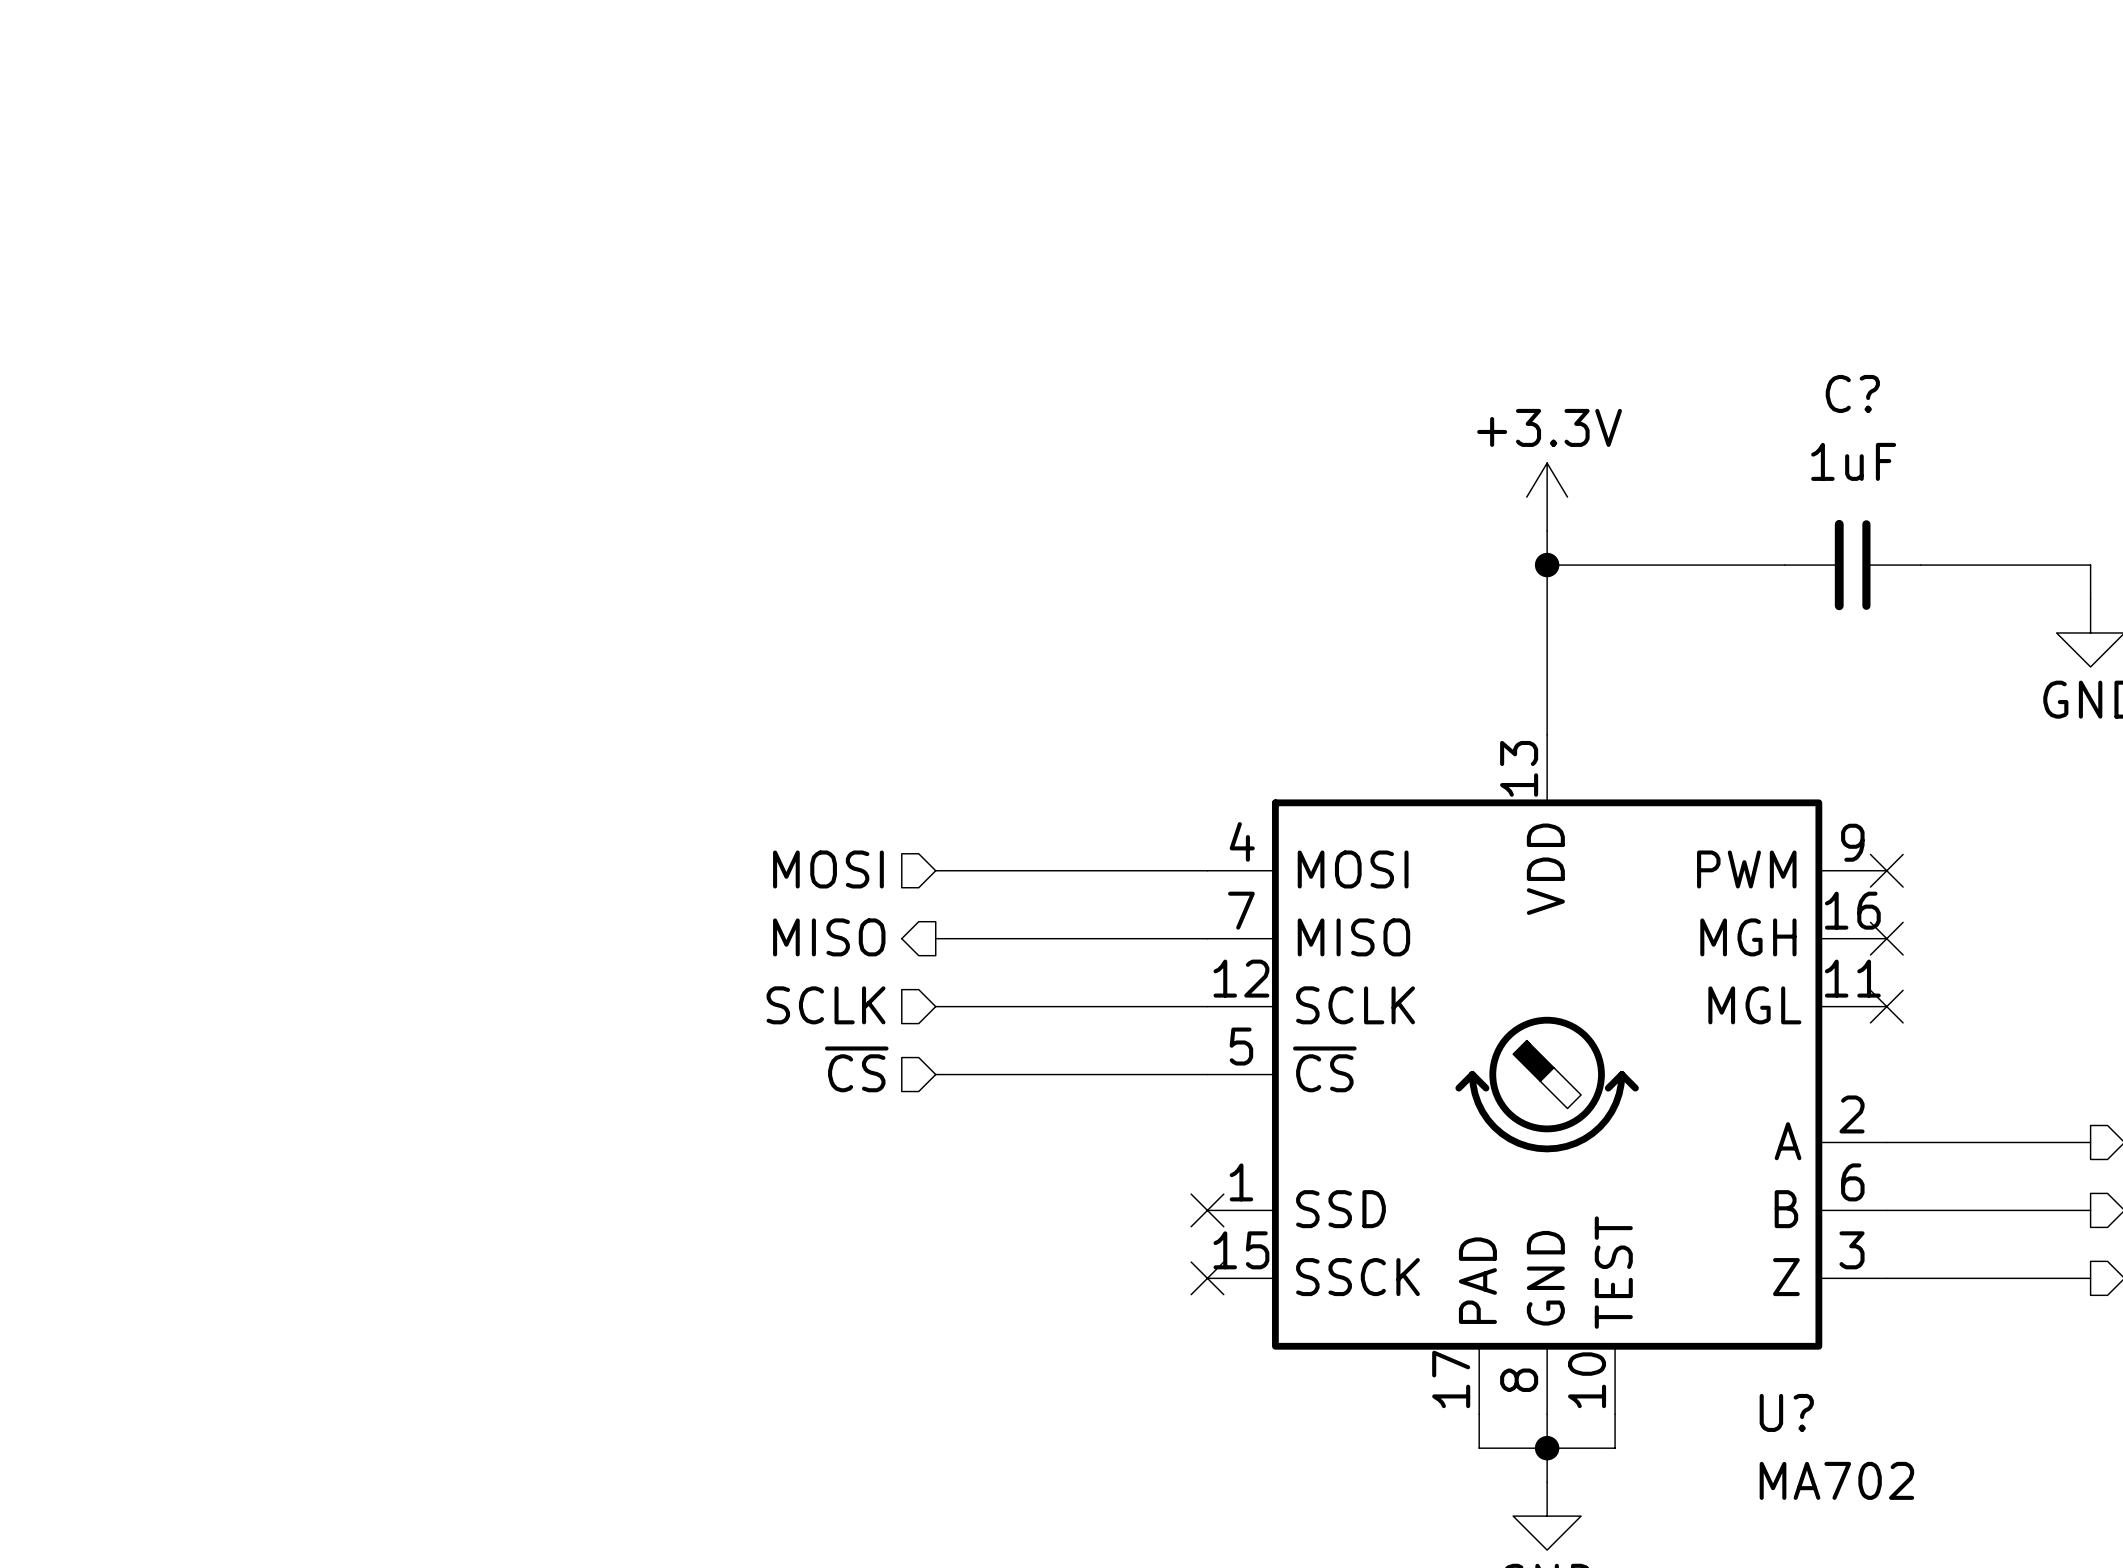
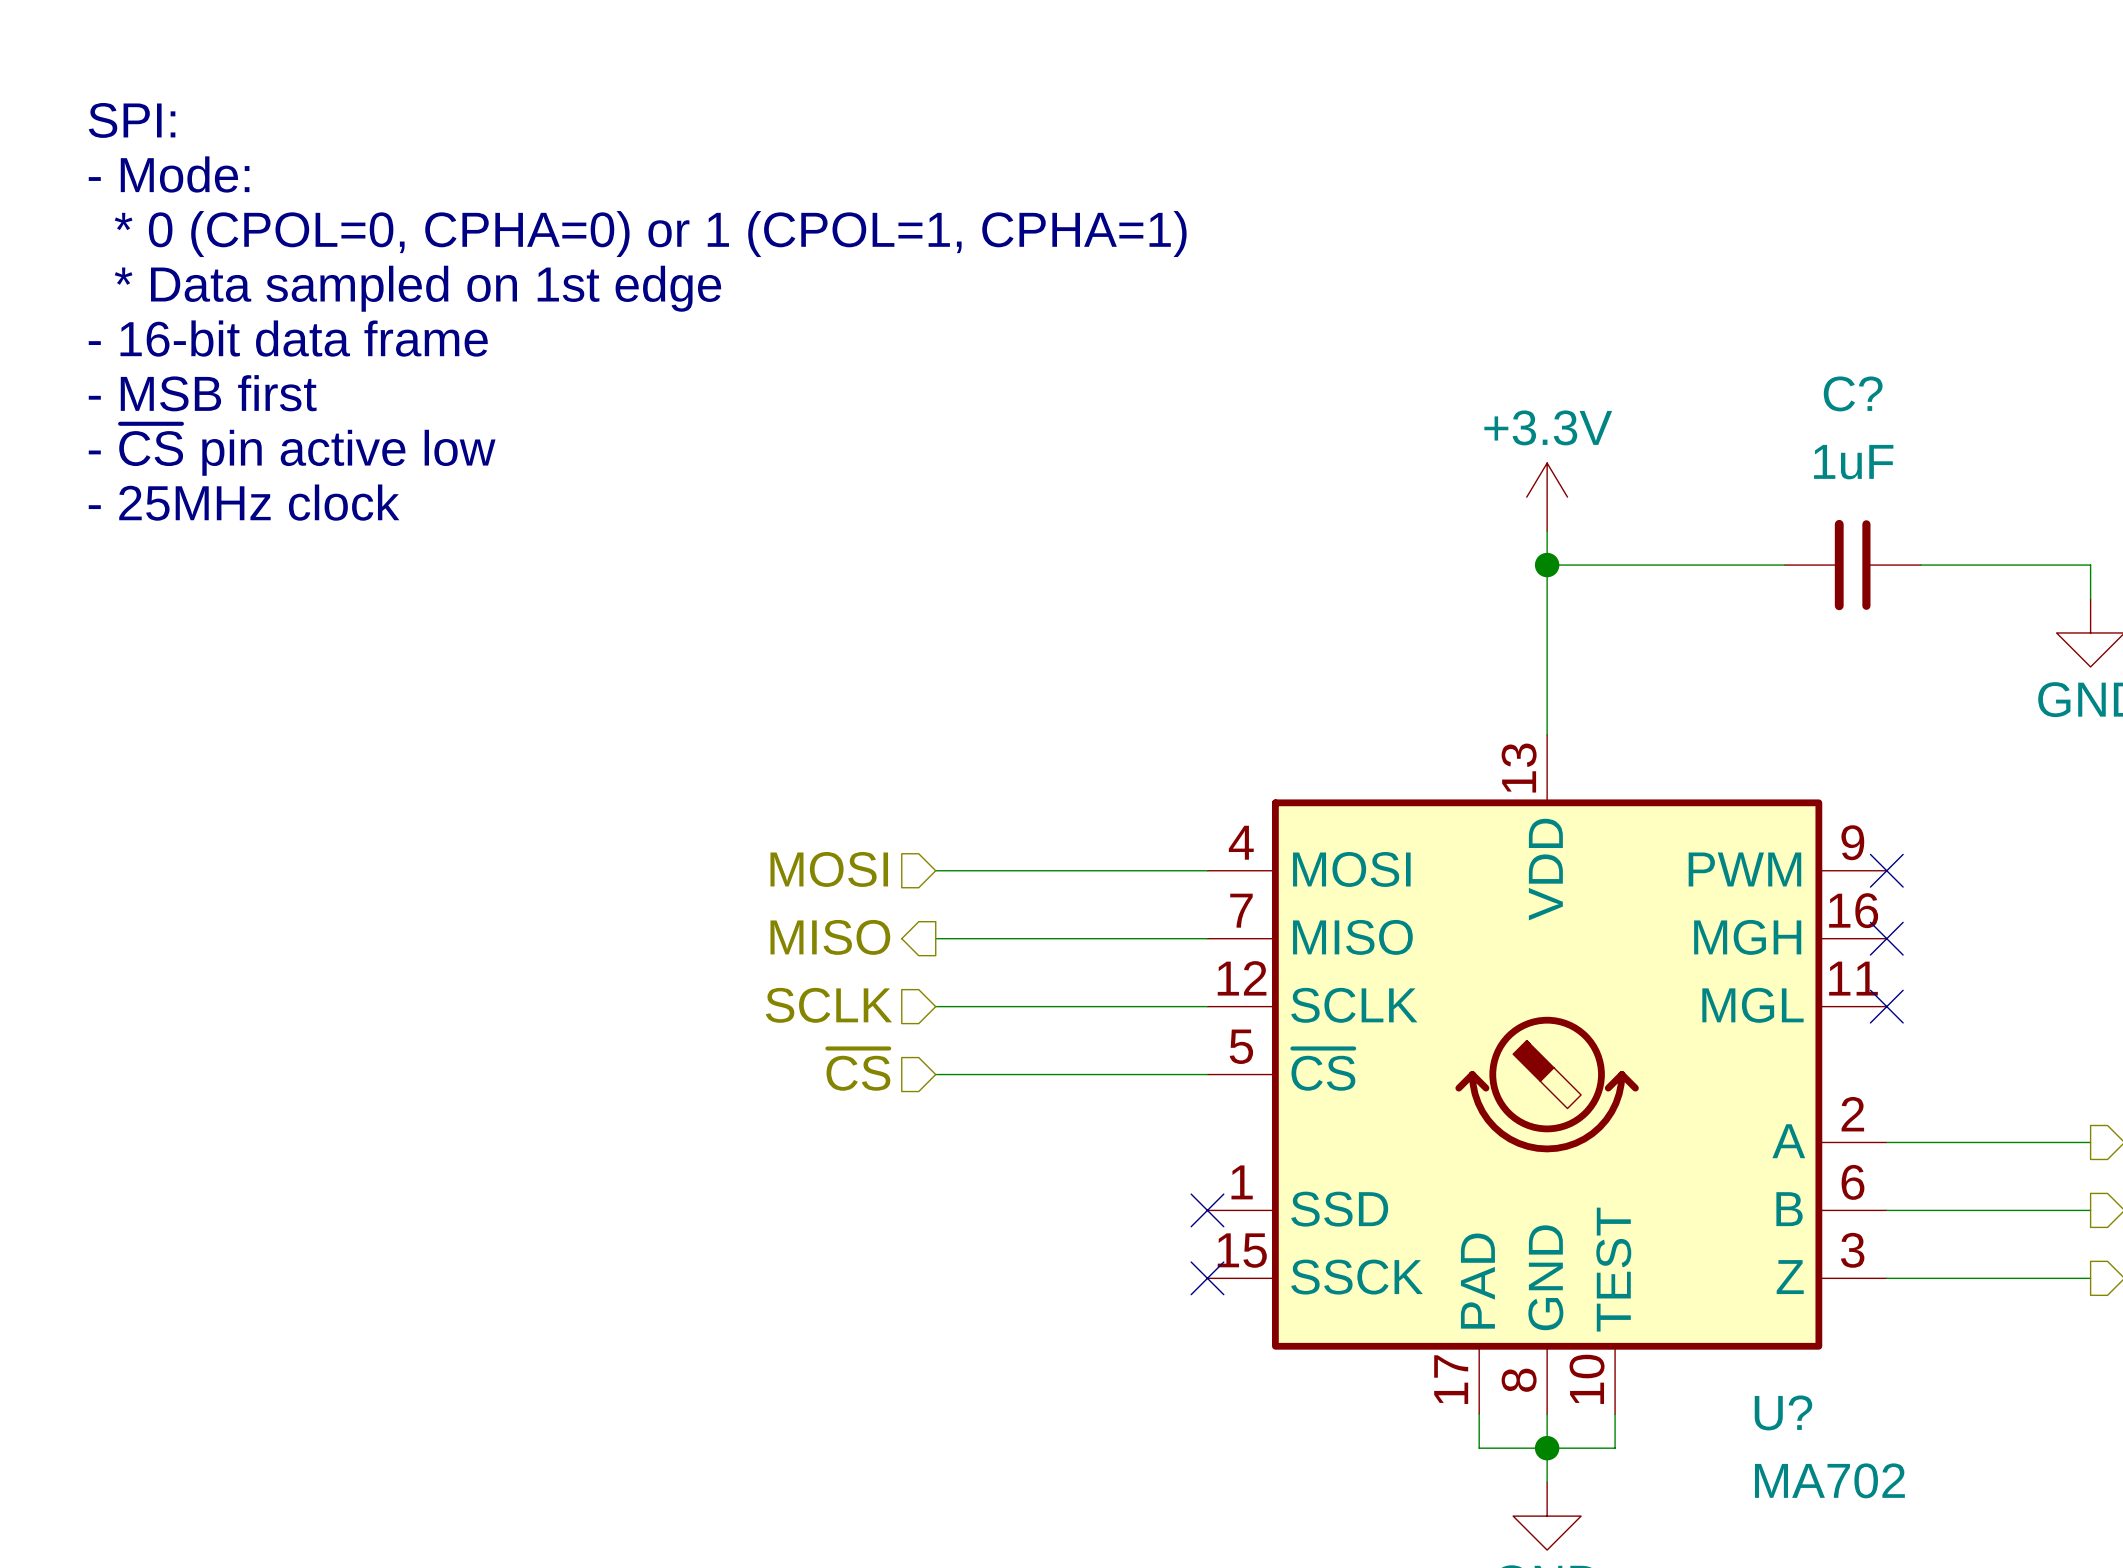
text: none -> SPI: (132, 120)
text: none -> - Mode: (169, 174)
text: none -> * 0 (CPOL=0, CPHA=0) or 1 (CPOL=1, CPHA=1) (650, 234)
text: none -> * Data sampled on 1st edge (417, 288)
text: none -> - 16-bit data frame (288, 338)
text: none -> - MSB first (202, 393)
text: none -> - ~{CS} pin active low (292, 449)
text: none -> - 25MHz clock (244, 502)

